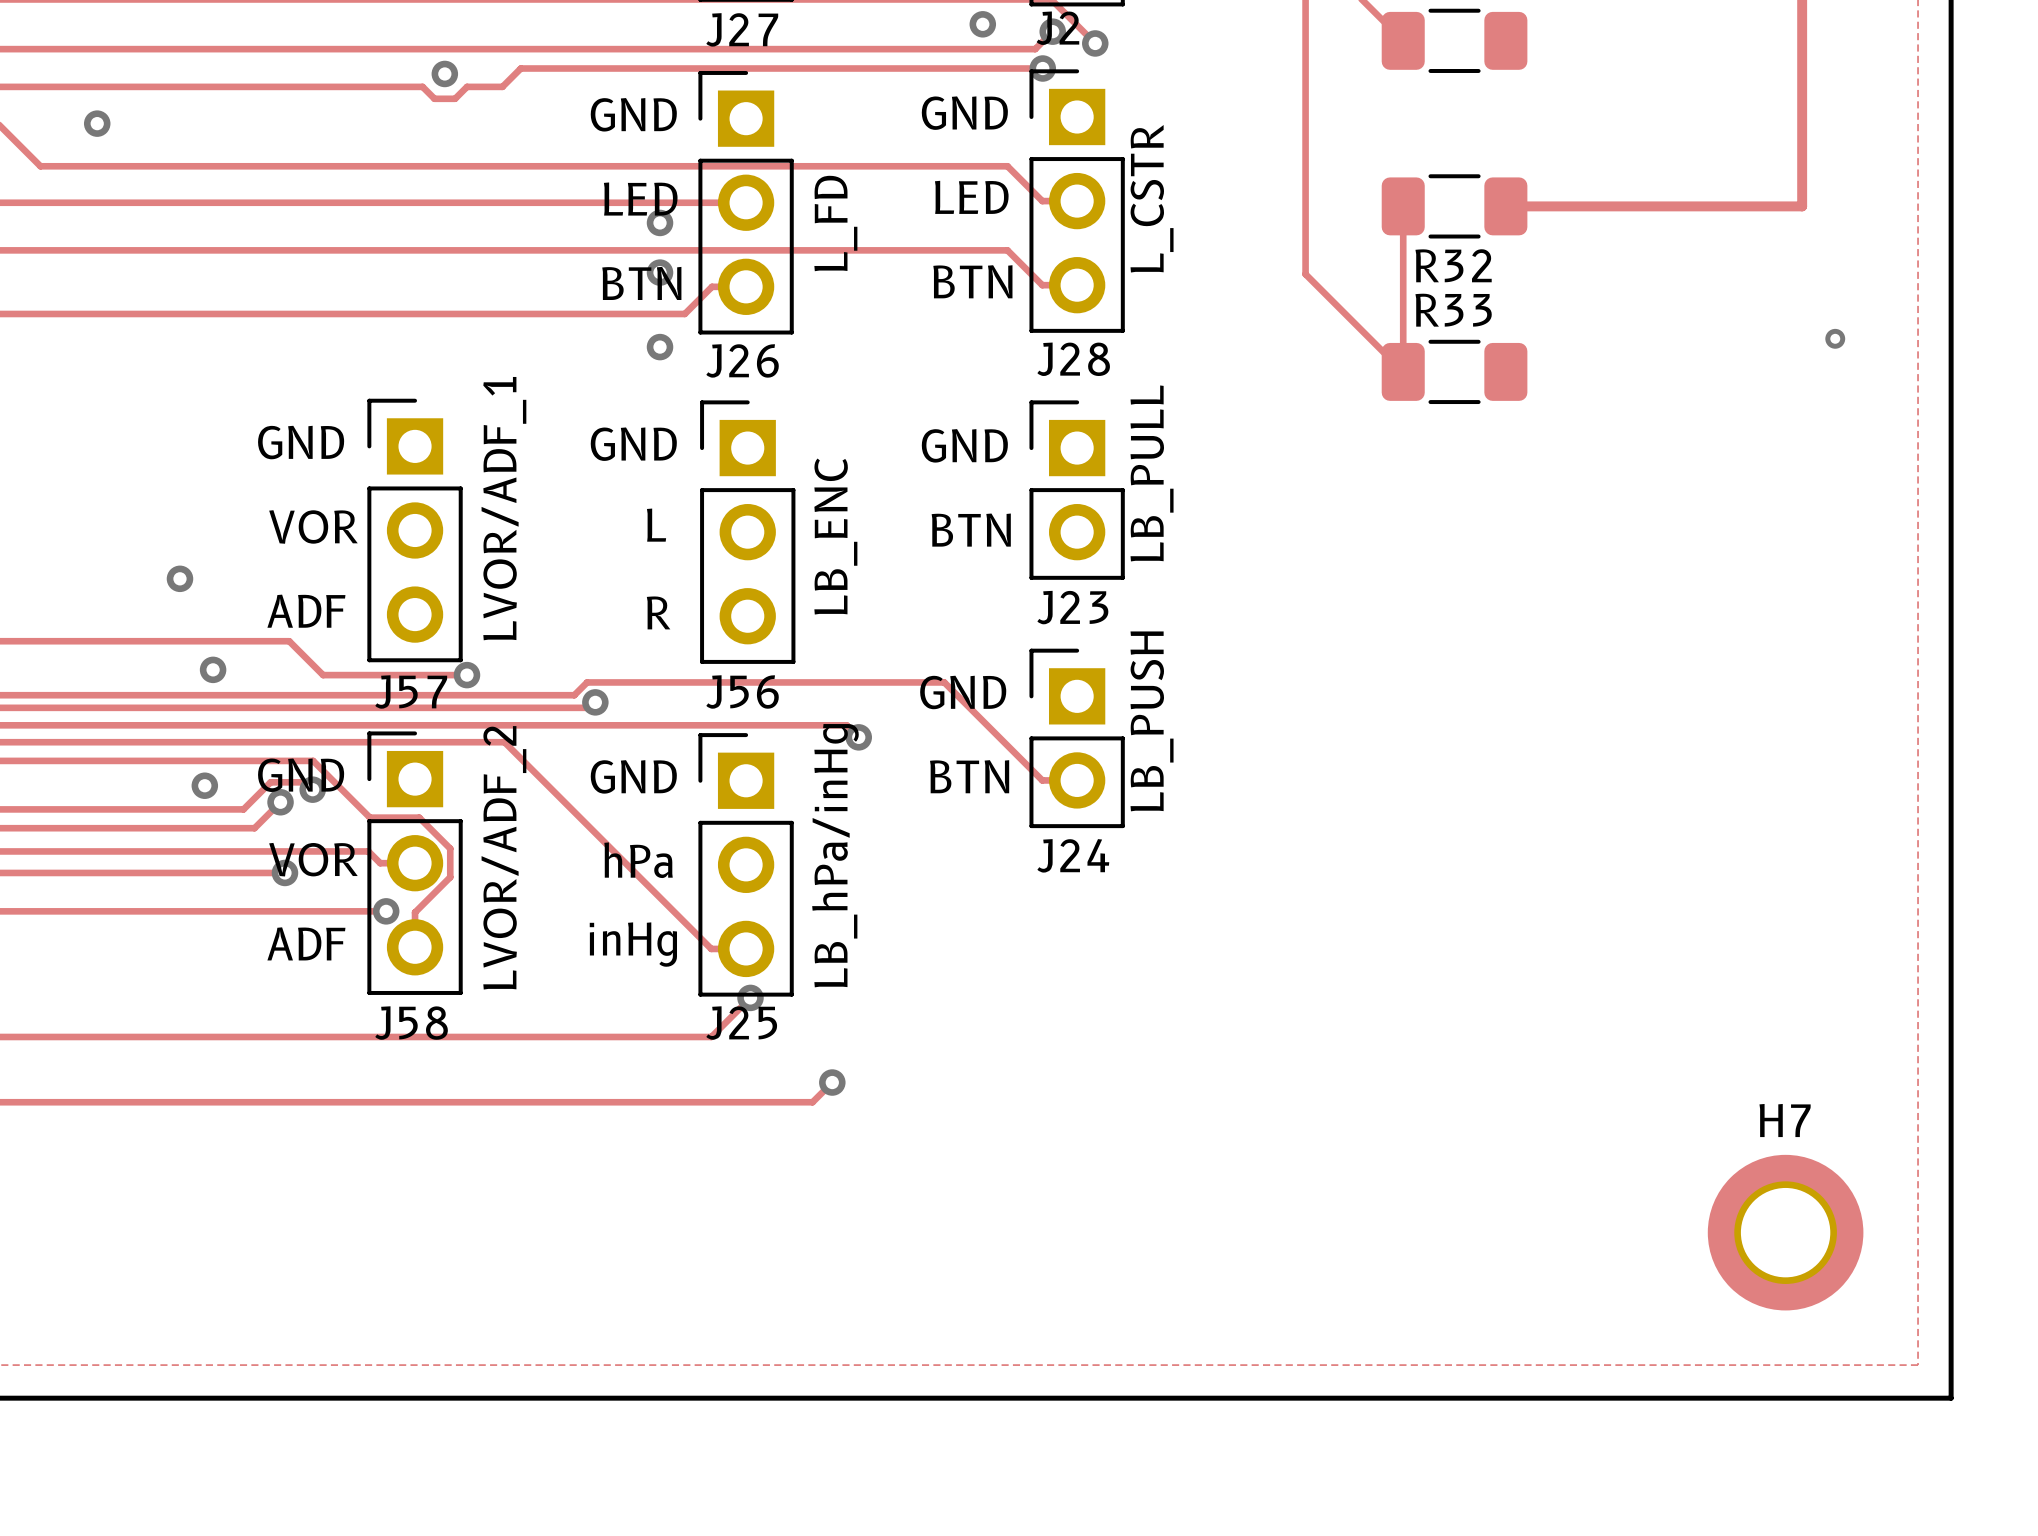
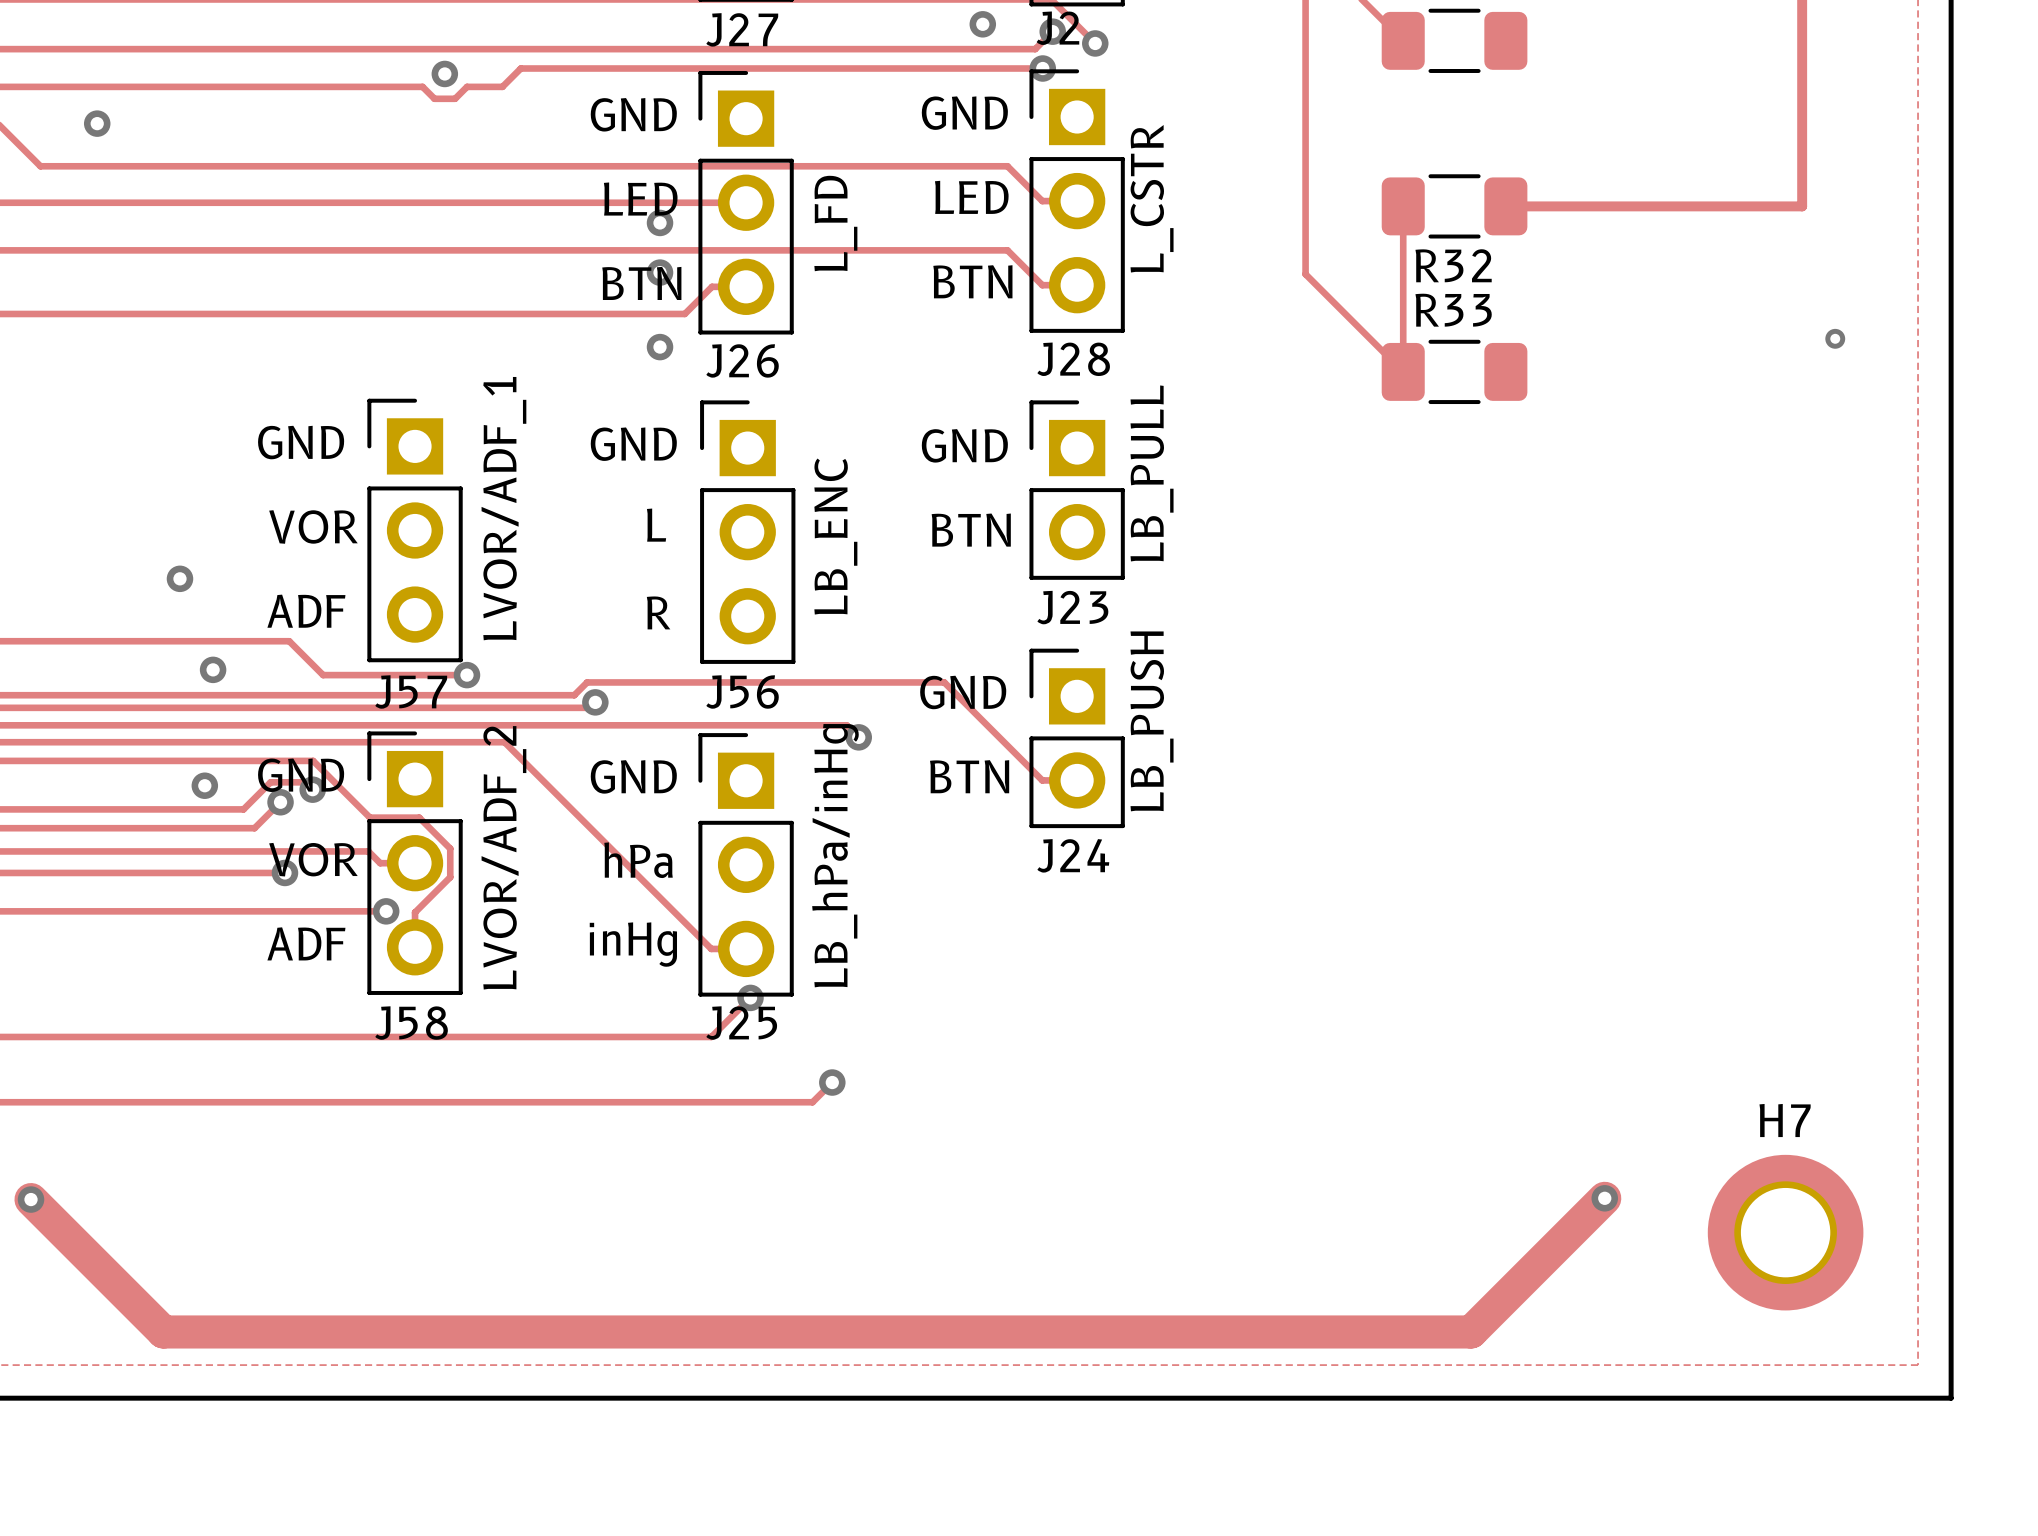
track: none -> (1604, 1198) (1471, 1331) (163, 1331) (31, 1199)
via: none -> (1604, 1198)
via: none -> (31, 1199)

